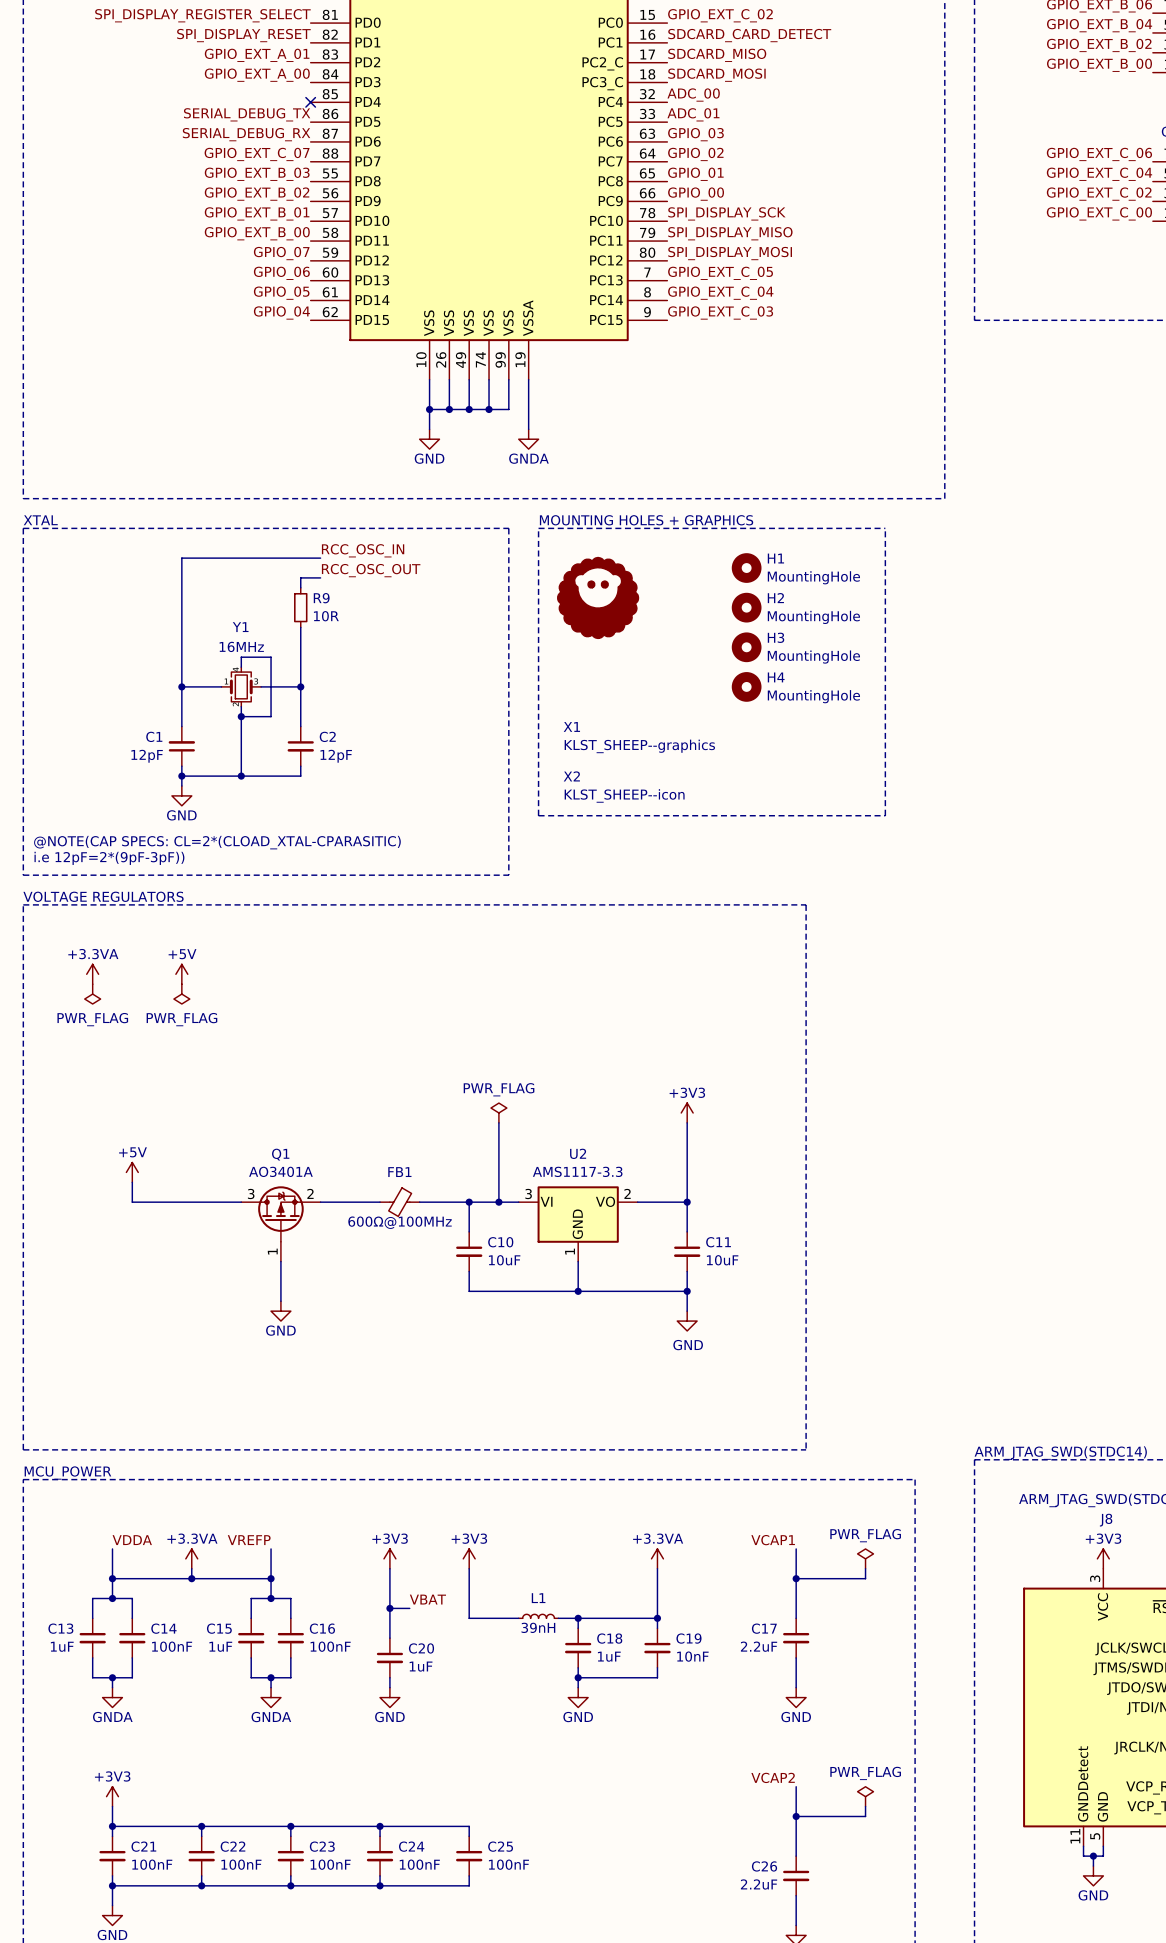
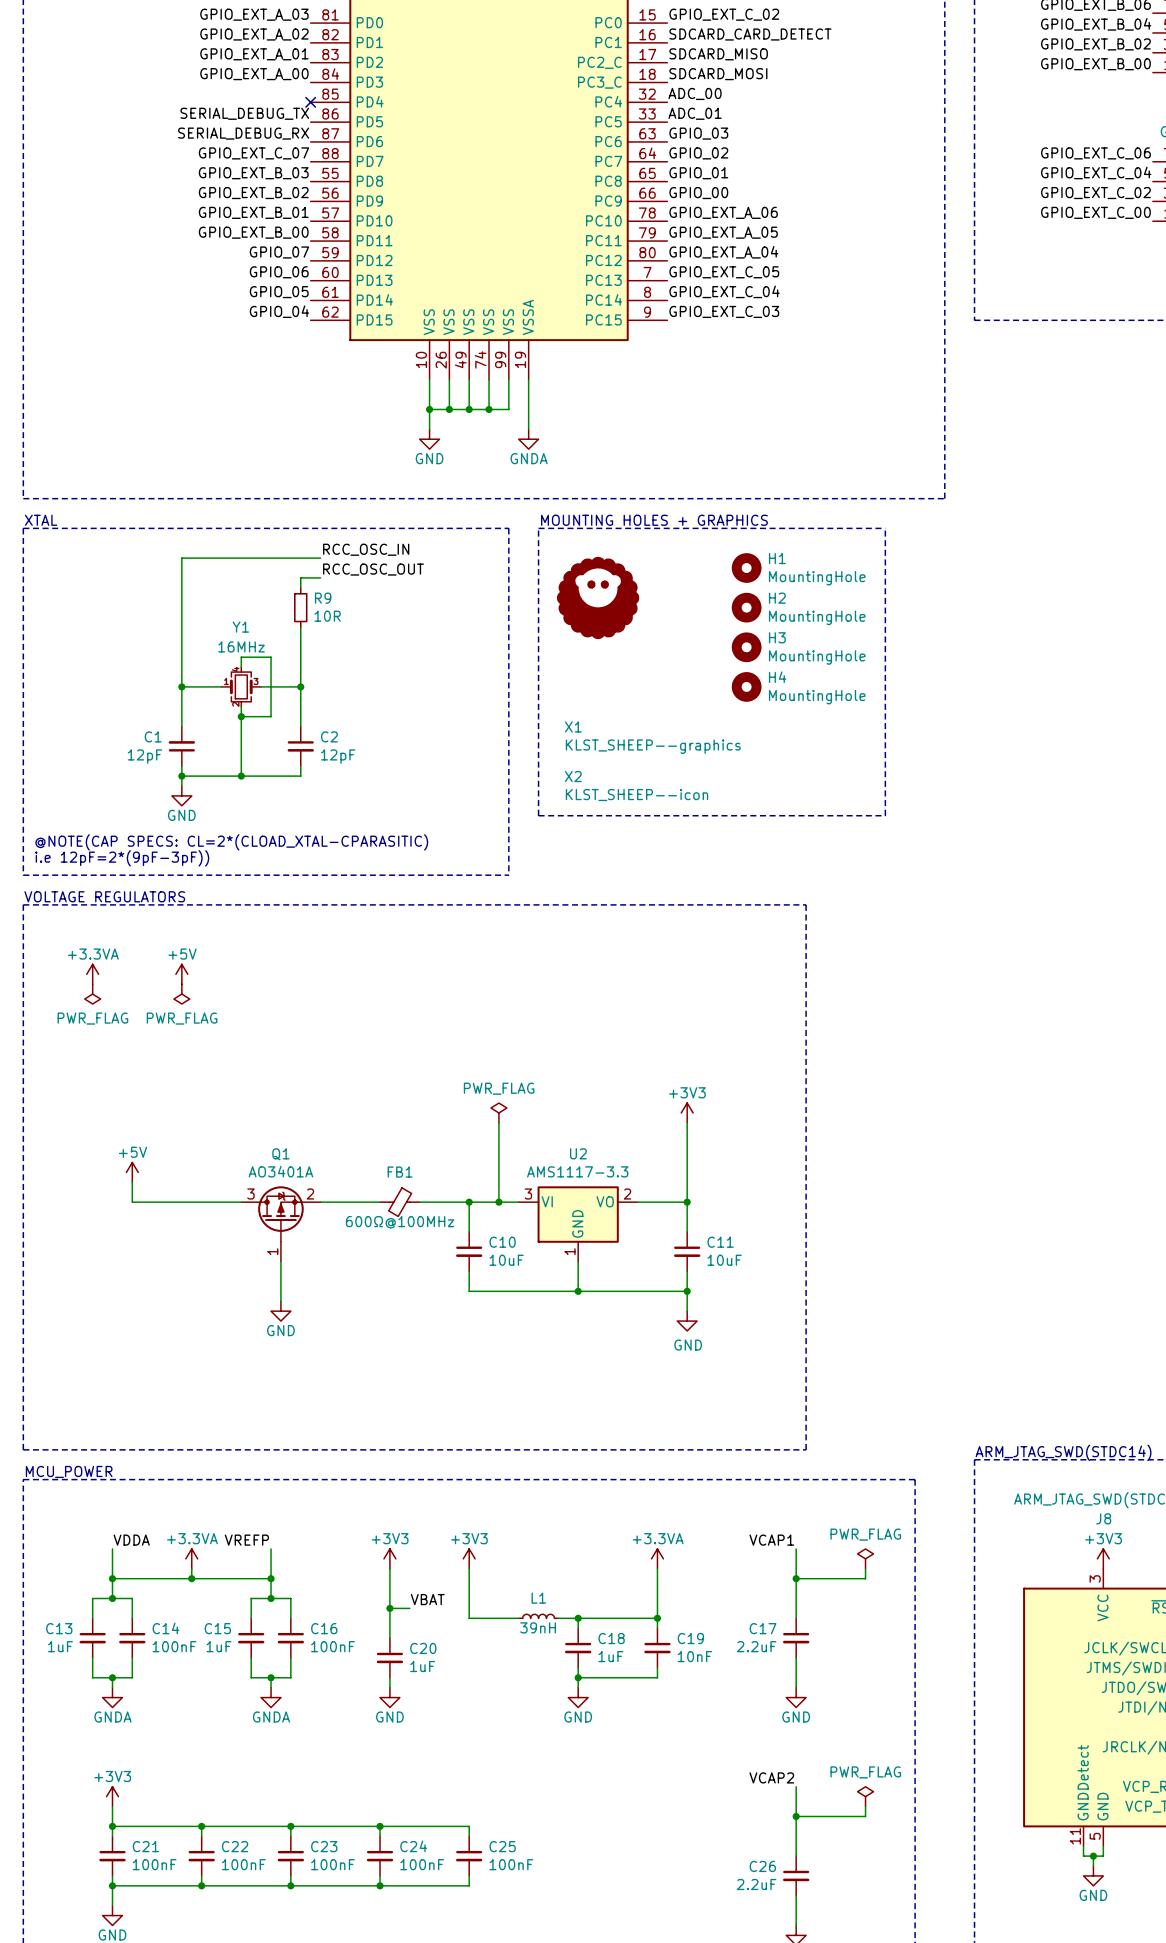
label: SPI_DISPLAY_REGISTER_SELECT (202, 15) -> GPIO_EXT_A_03 (254, 14)
label: SPI_DISPLAY_RESET (243, 35) -> GPIO_EXT_A_02 (254, 34)
label: SPI_DISPLAY_SCK (726, 213) -> GPIO_EXT_A_06 (723, 212)
label: SPI_DISPLAY_MISO (730, 233) -> GPIO_EXT_A_05 (723, 232)
label: SPI_DISPLAY_MOSI (730, 253) -> GPIO_EXT_A_04 (723, 252)

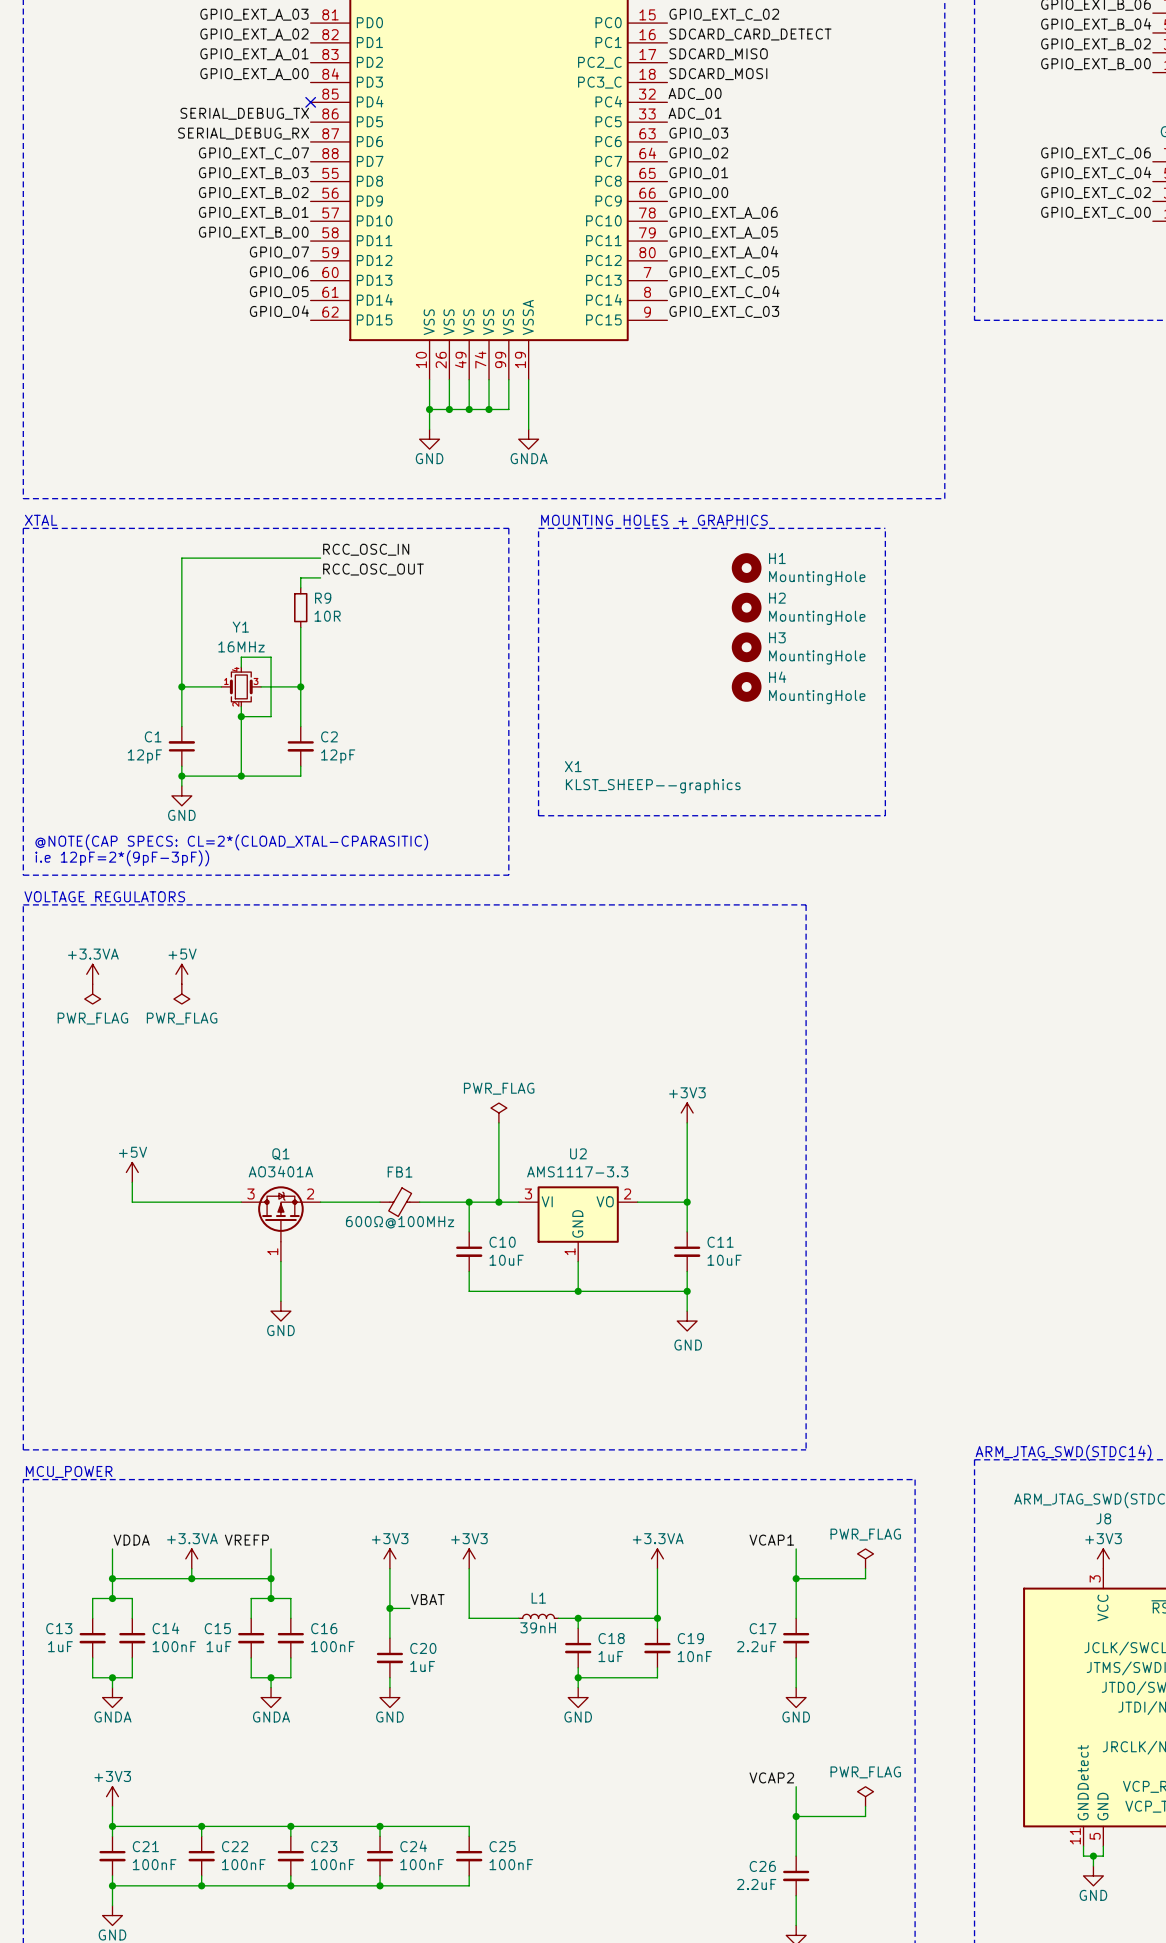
power symbol: (598, 597) -> none
X1 position: (652, 737) -> (652, 777)
X2: KLST_SHEEP--icon (636, 786) -> none

